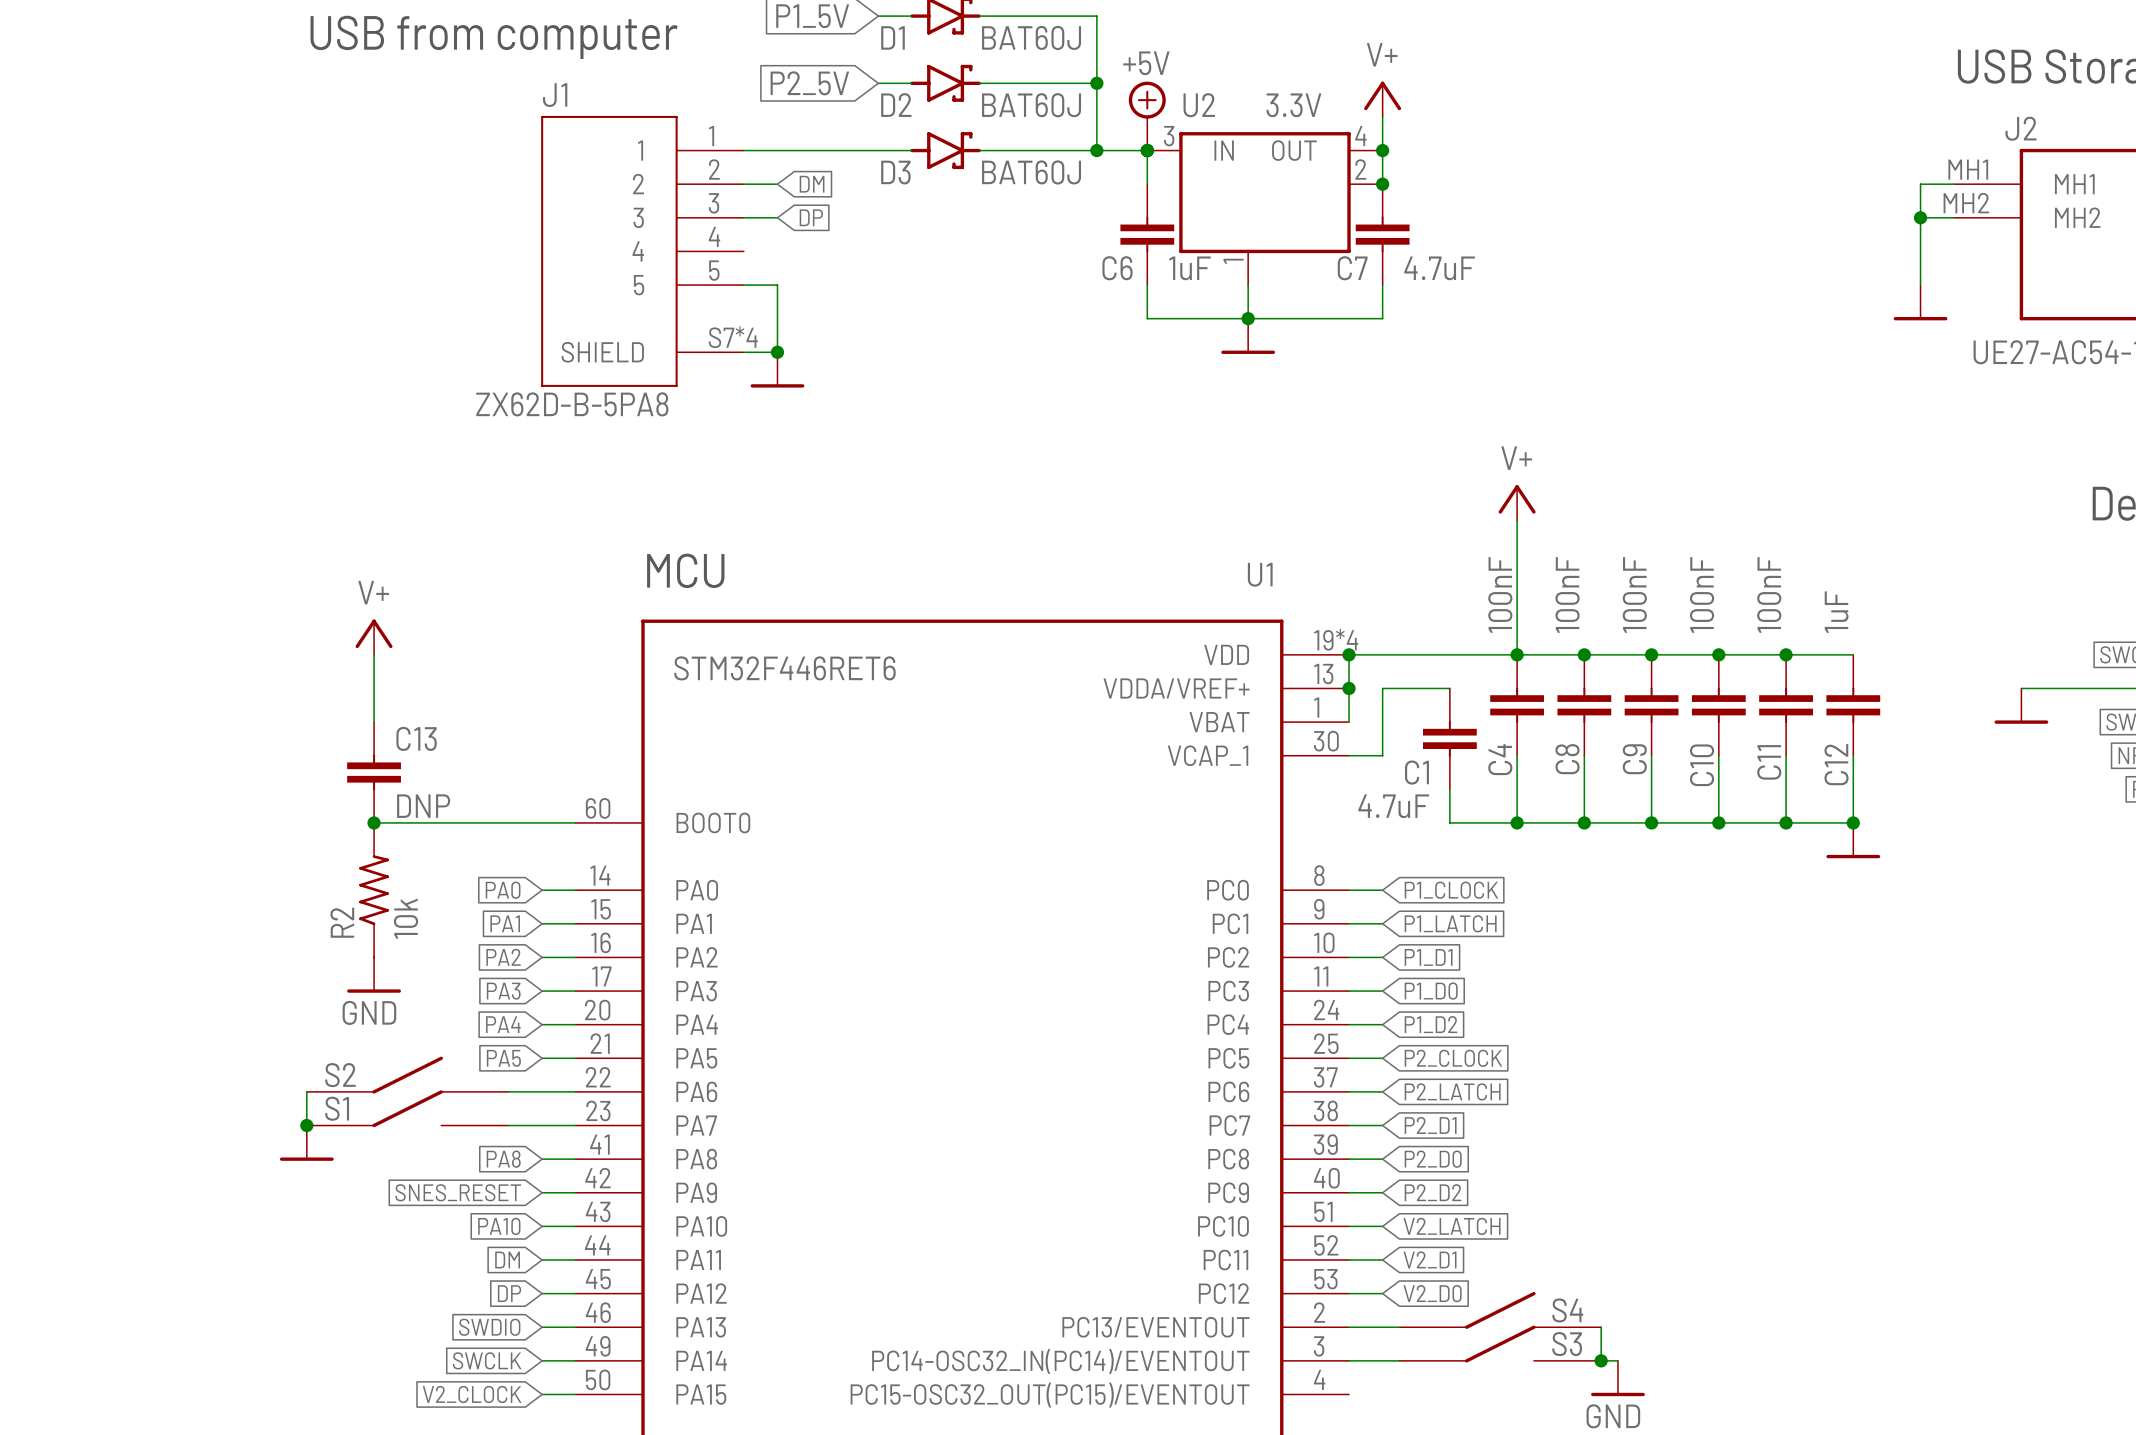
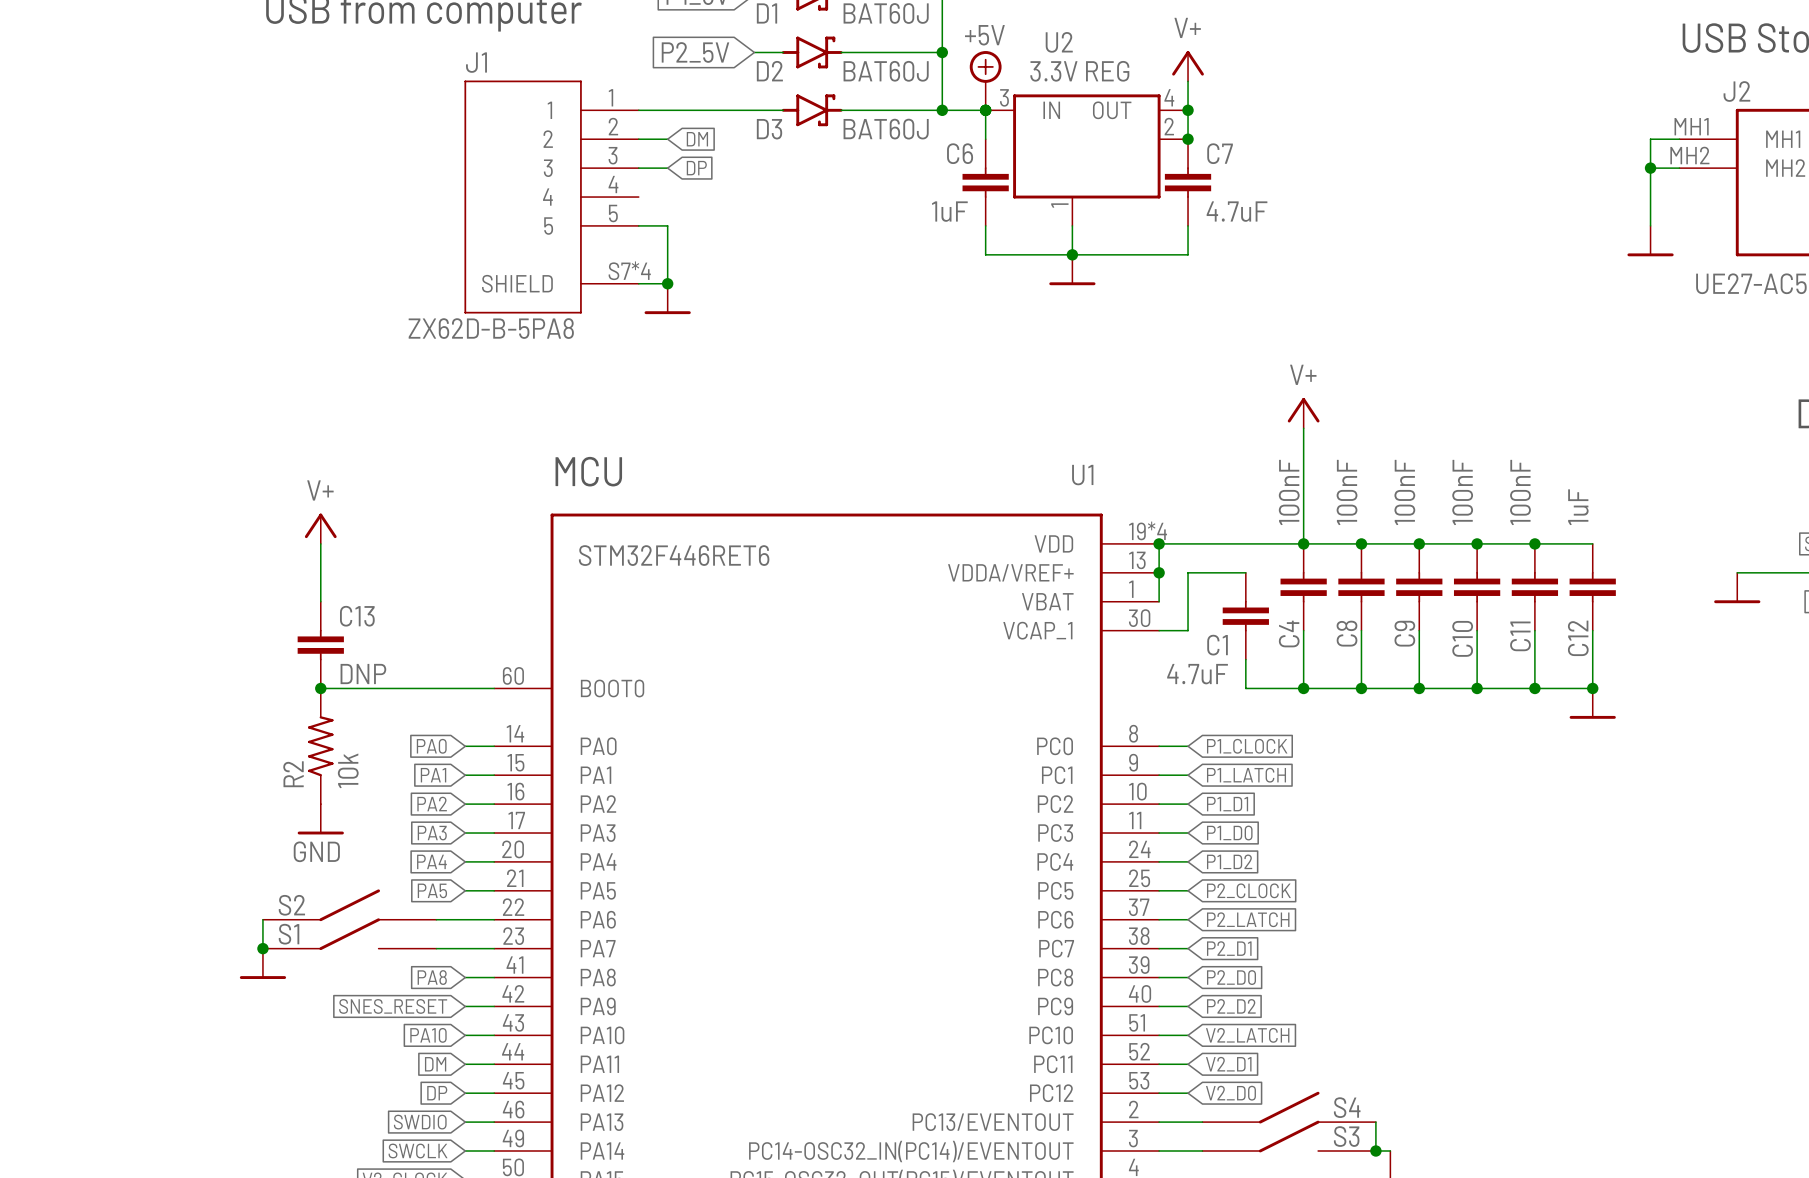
U2 name position: U2 (1199, 105) -> U2 (1059, 42)
U2 value: 3.3V (1293, 105) -> 3.3V REG (1079, 71)
C6 name position: C6 (1117, 268) -> C6 (960, 153)
C6 value position: 1uF (1190, 268) -> 1uF (949, 211)
C7 name position: C7 (1352, 268) -> C7 (1220, 153)

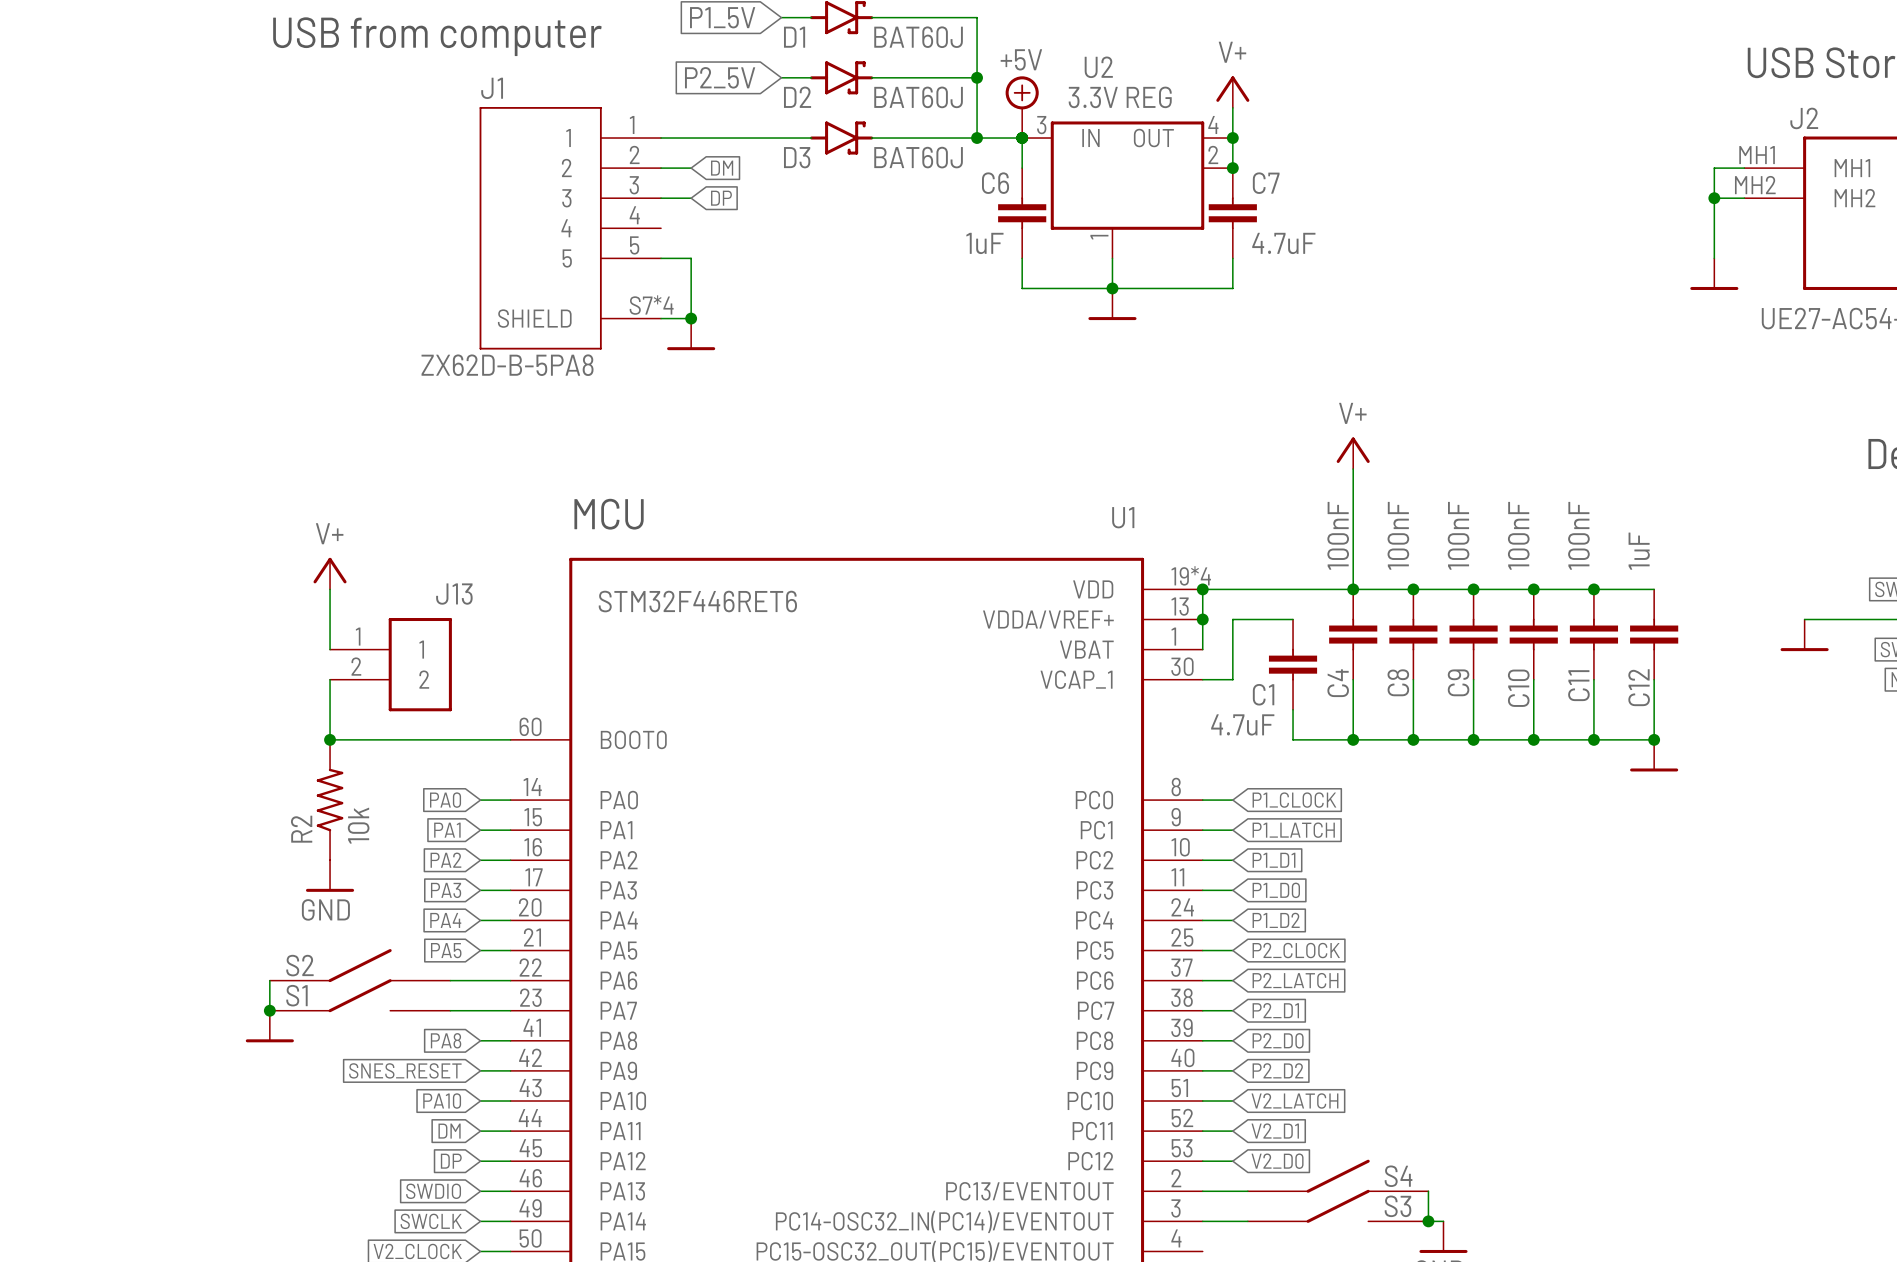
J13: none -> (390, 664)
C13: DNP (320, 645) -> none

